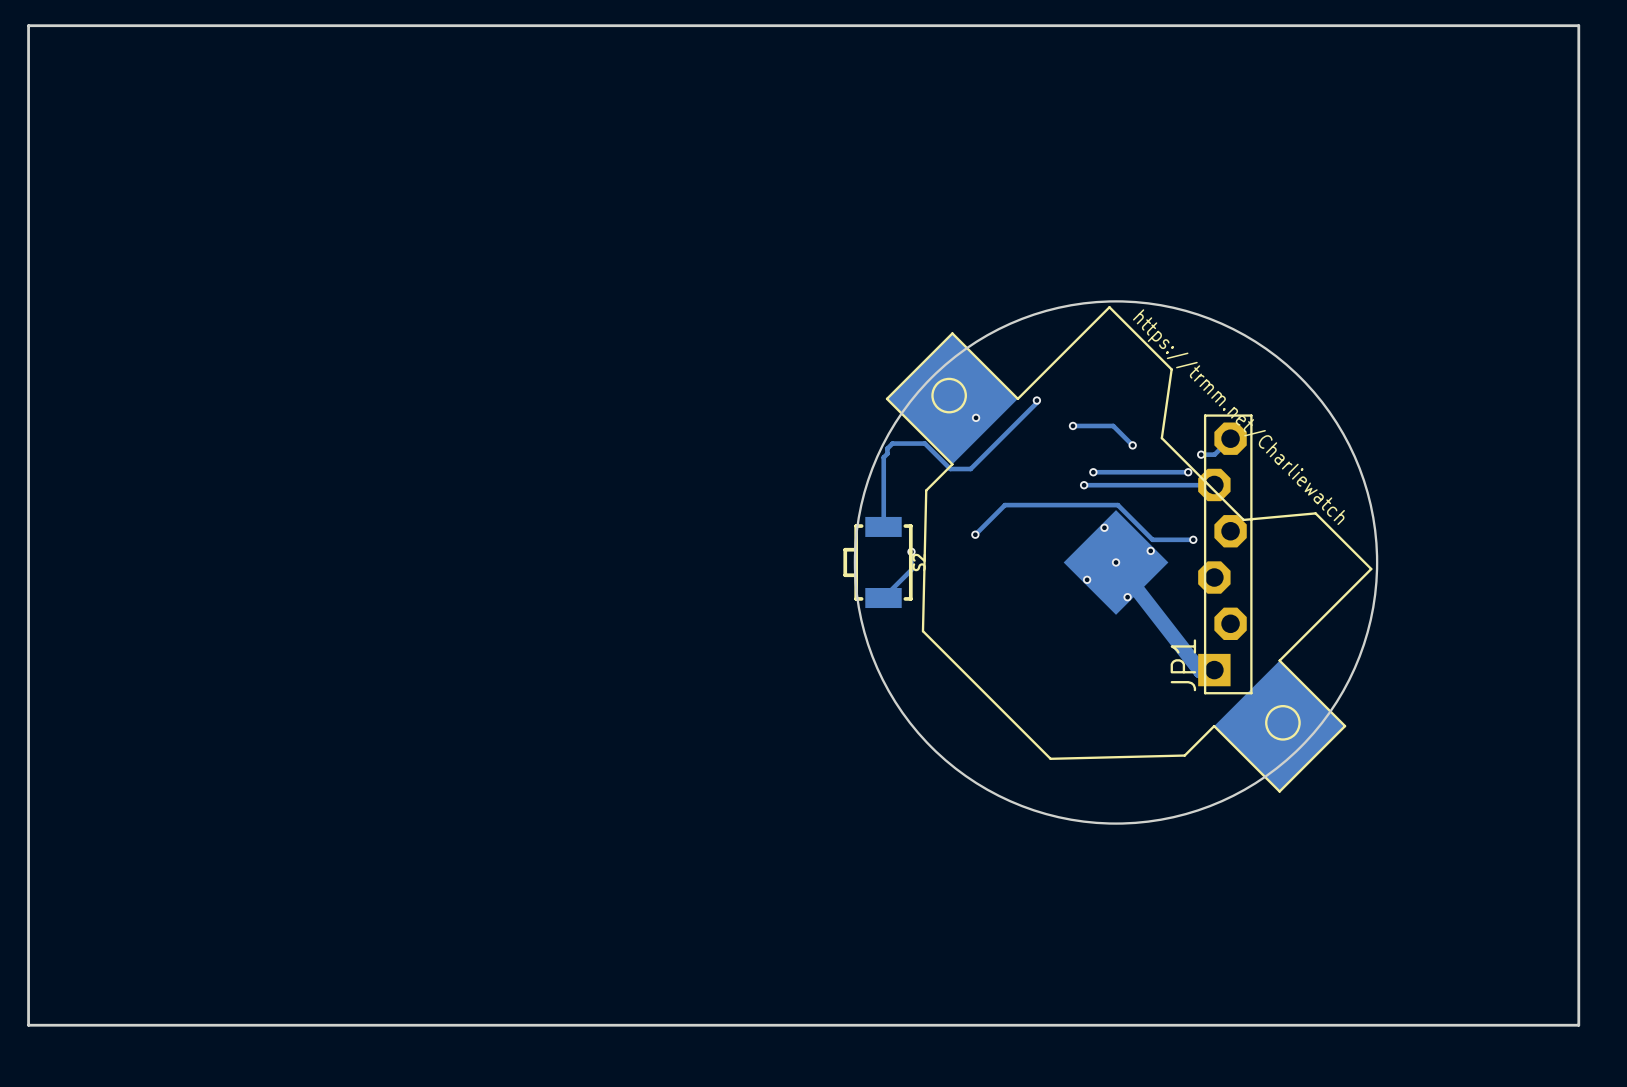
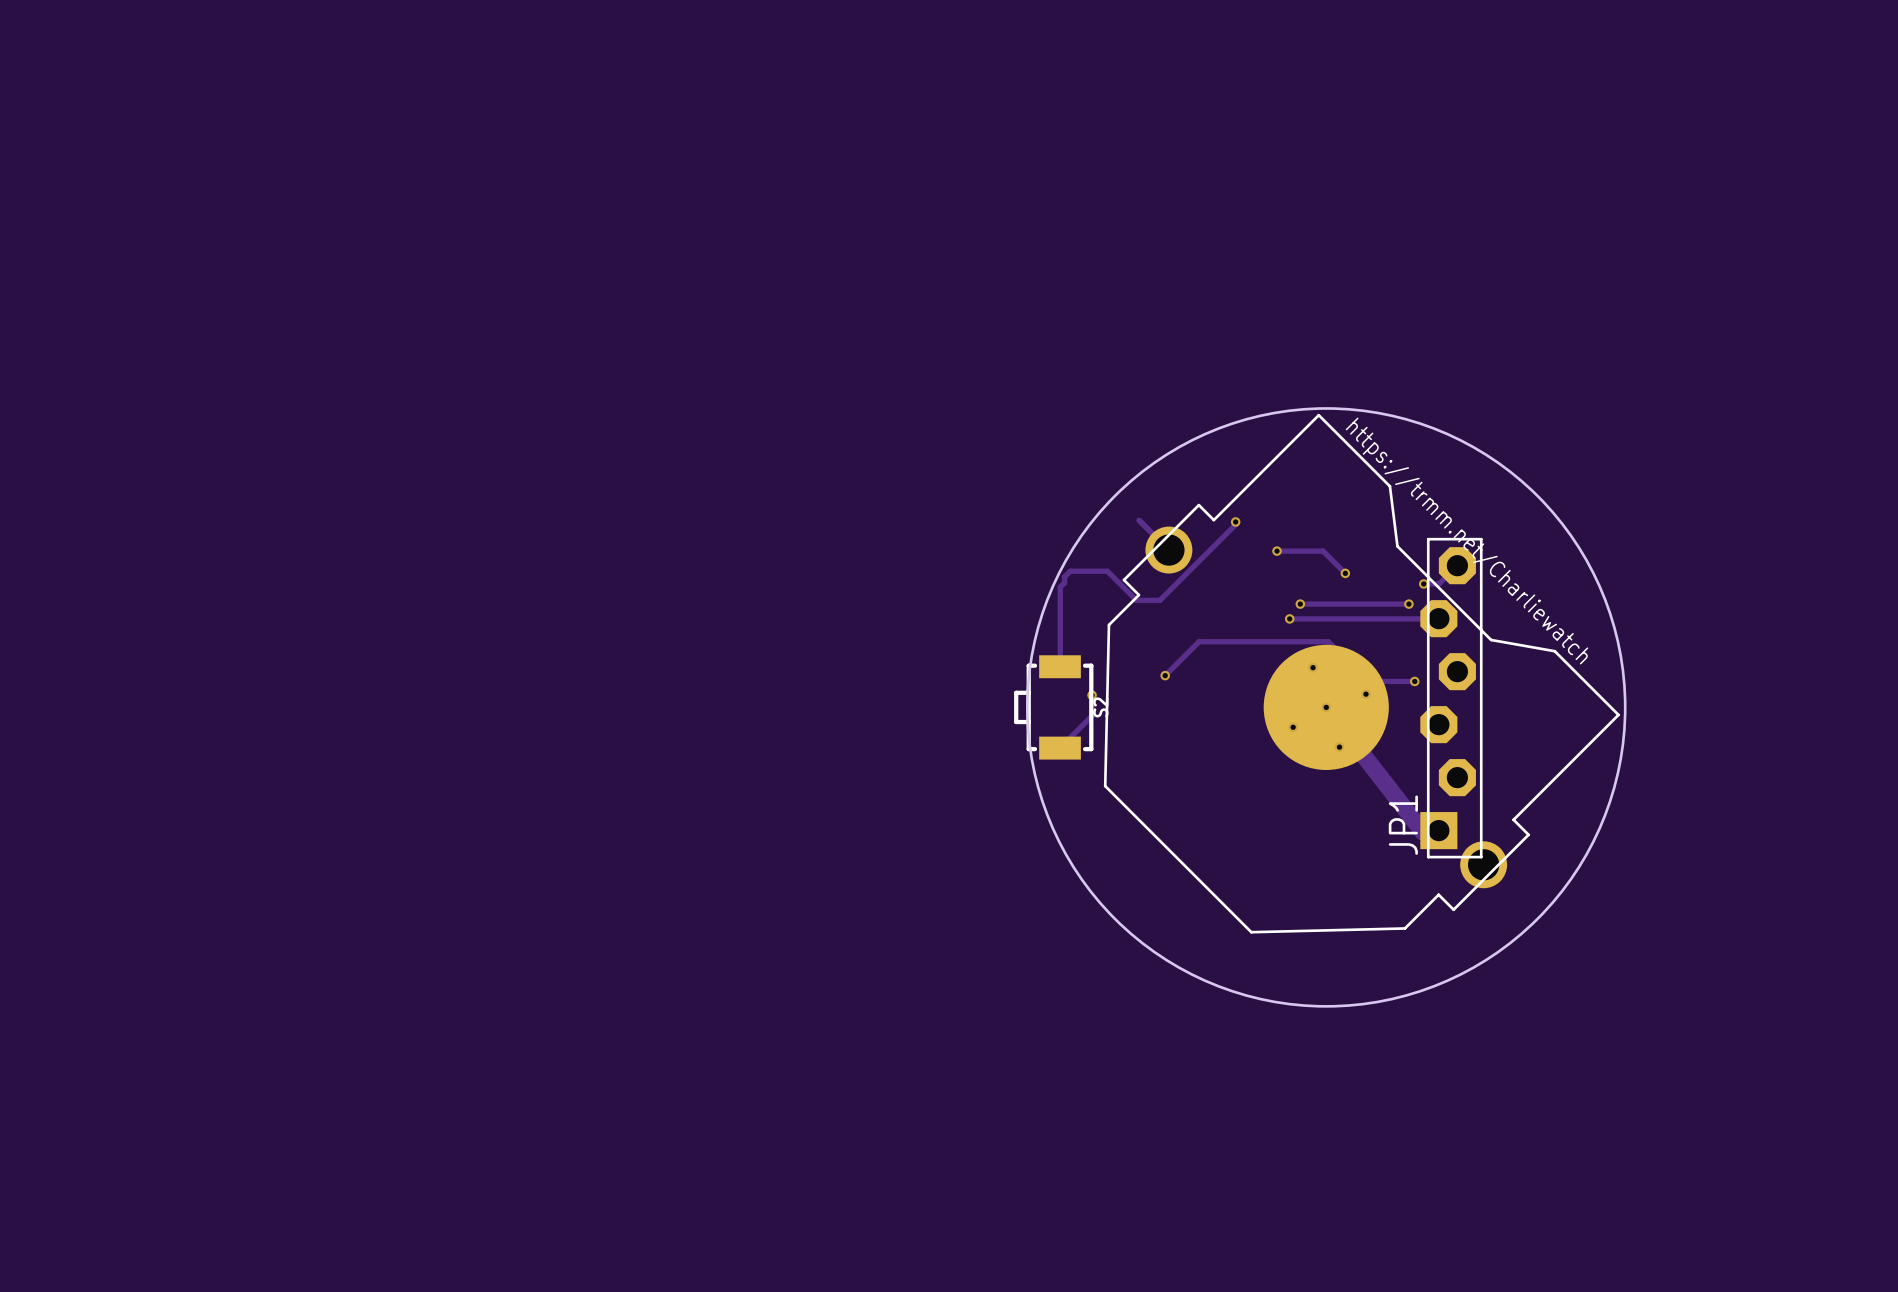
board edge: (1578, 25) (1578, 1025) (28, 1025) (28, 25) (1578, 25) -> none
part: none -> (1361, 673)
part: (1129, 549) -> none

